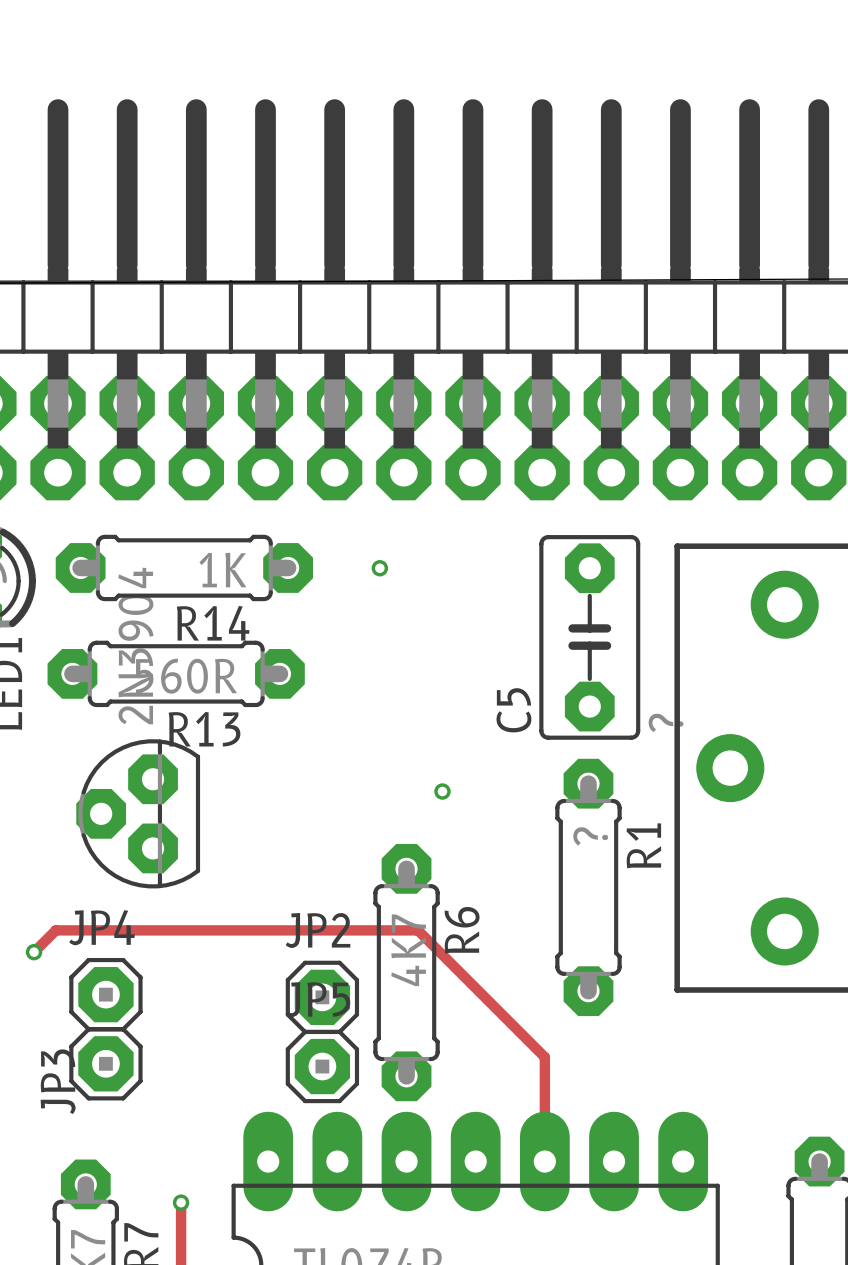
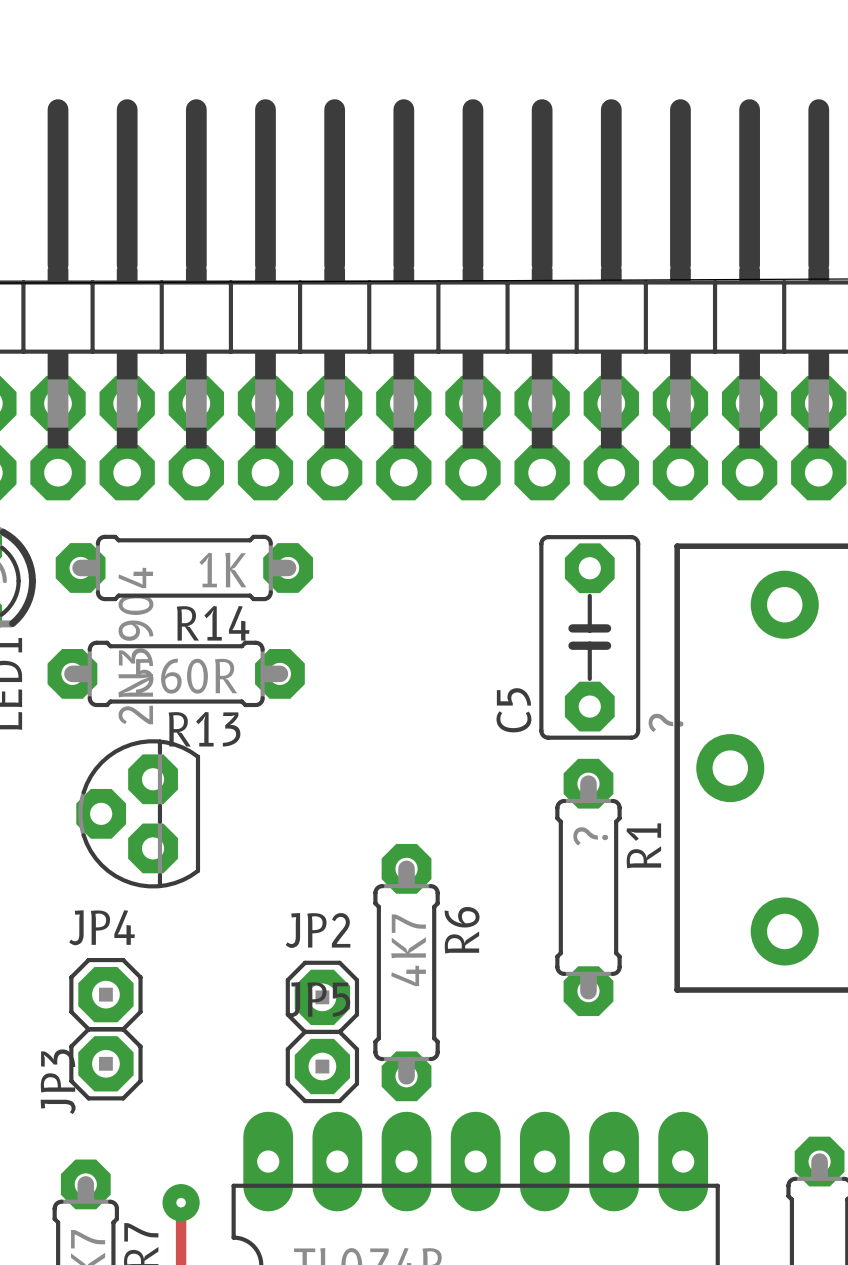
via: (379, 568) -> none
via: (442, 791) -> none
track: (34, 952) (55, 930) (417, 930) (544, 1057) (544, 1161) -> none
via: (34, 952) -> none
via size: [172, 1194, 190, 1211] -> [162, 1184, 200, 1222]

